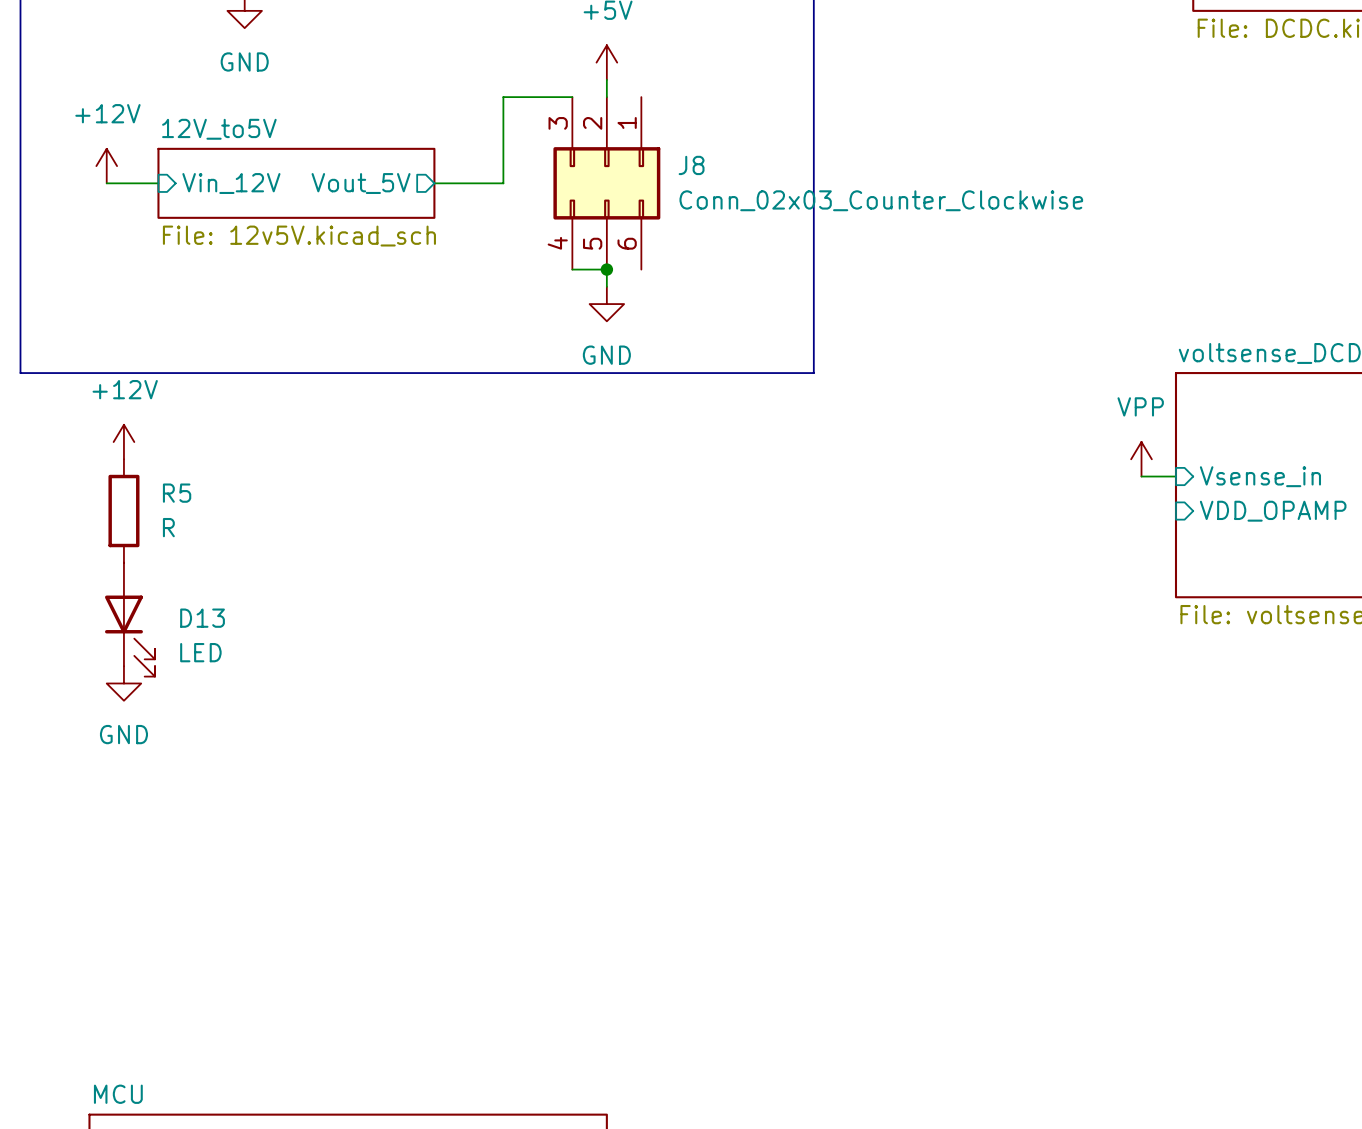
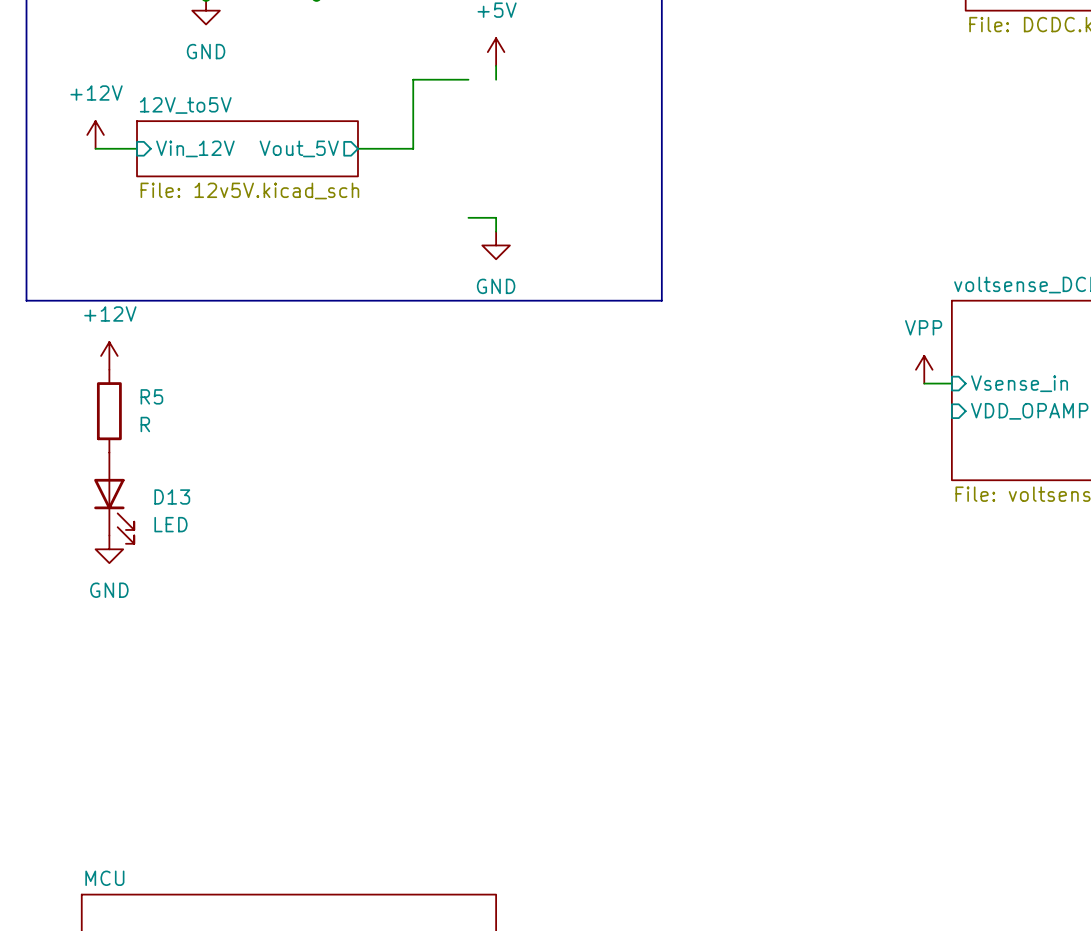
J8: Conn_02x03_Counter_Clockwise (606, 183) -> none
junction: (606, 269) -> none

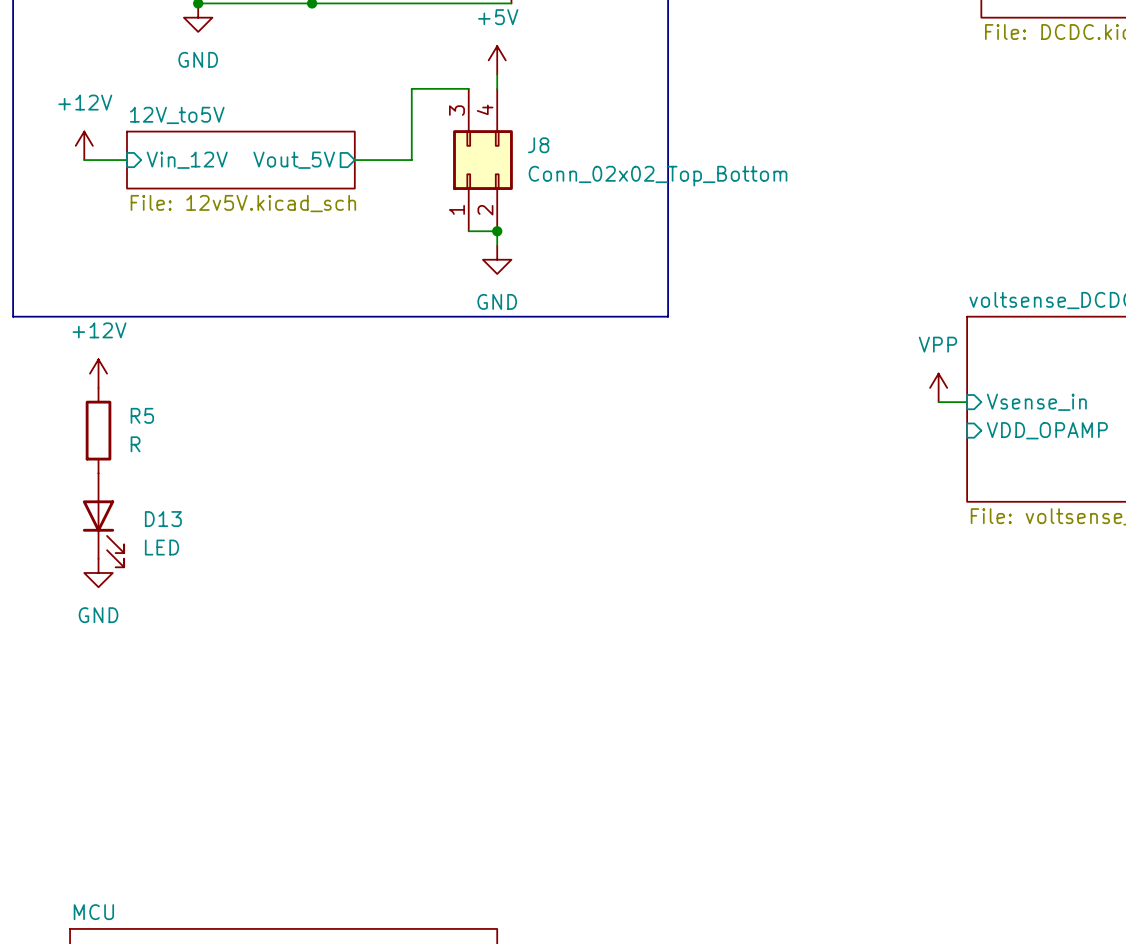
J8: none -> Conn_02x02_Top_Bottom (482, 160)
junction: none -> (497, 231)

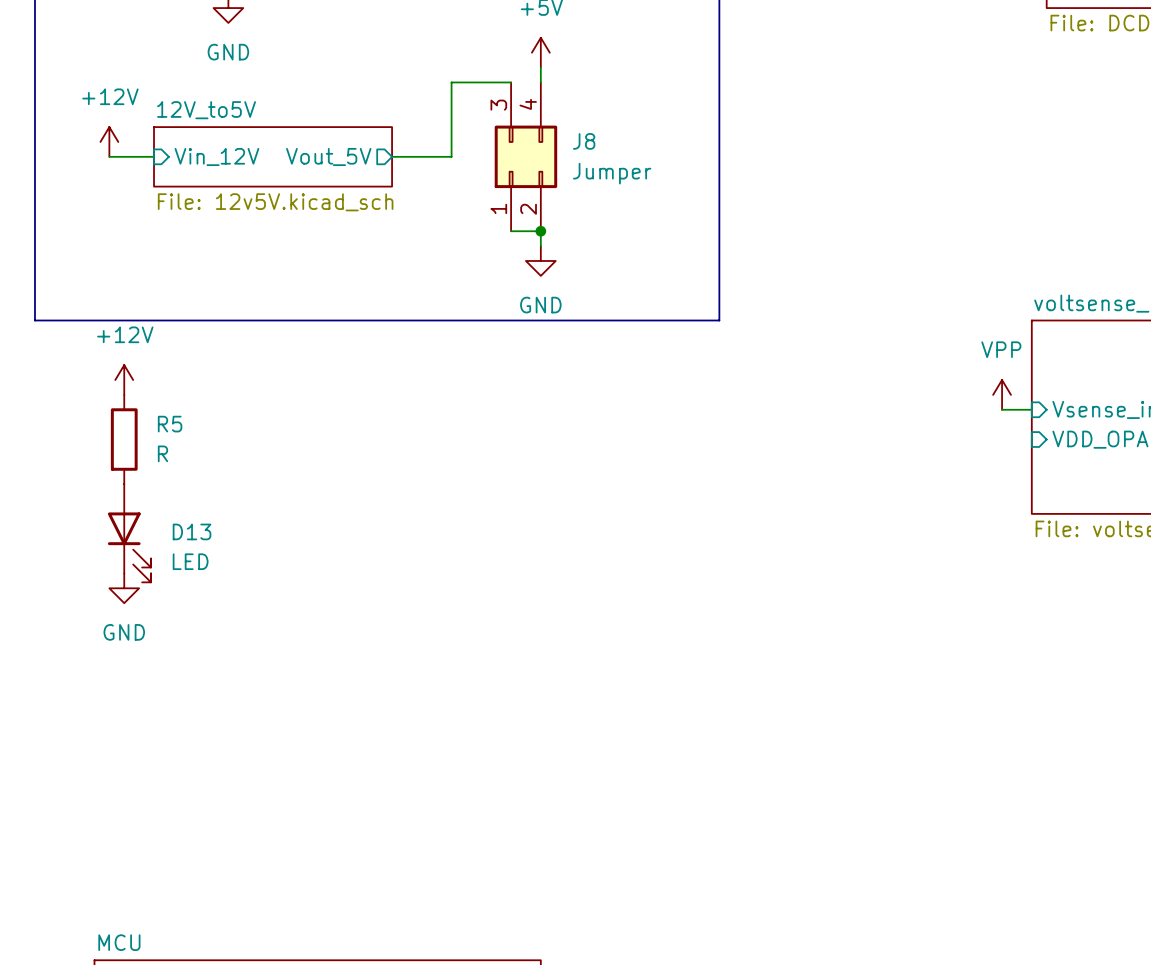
J8 value: Conn_02x02_Top_Bottom (658, 176) -> Jumper (612, 173)

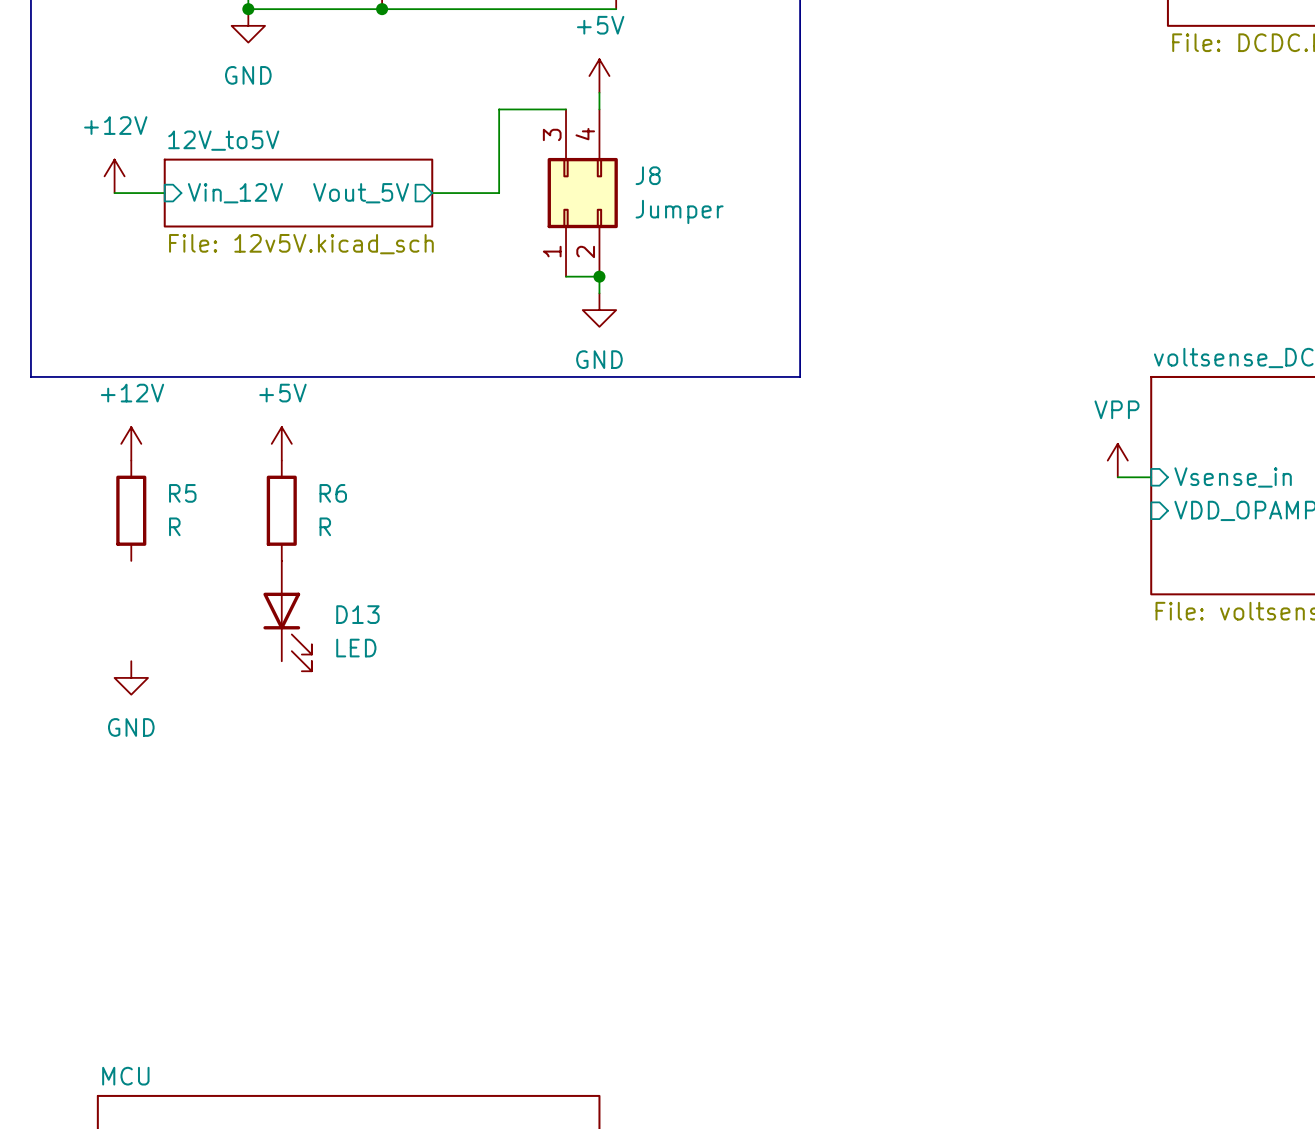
power symbol: none -> +5V (281, 443)
R6: none -> R (281, 510)
D13 position: (129, 533) -> (287, 616)

